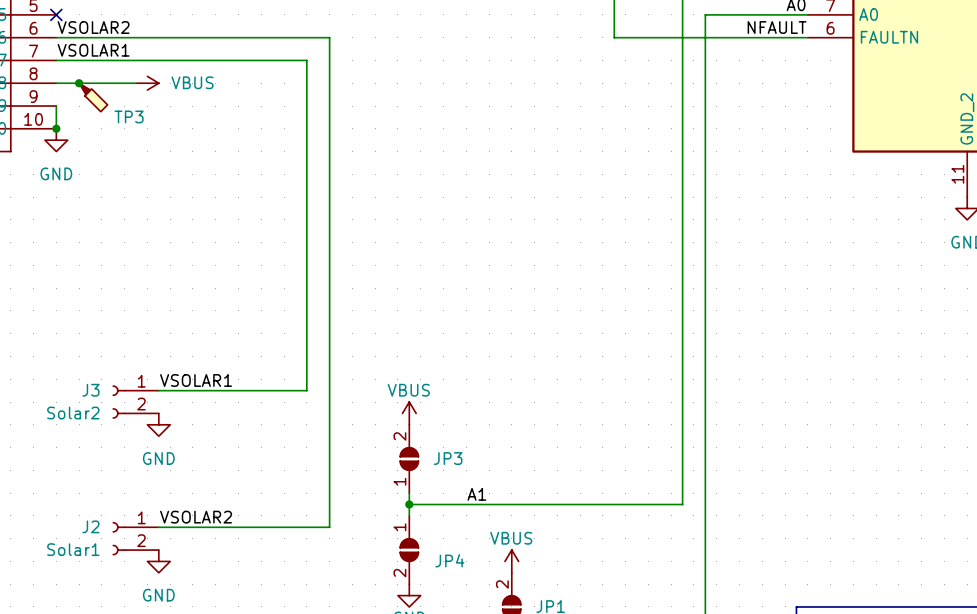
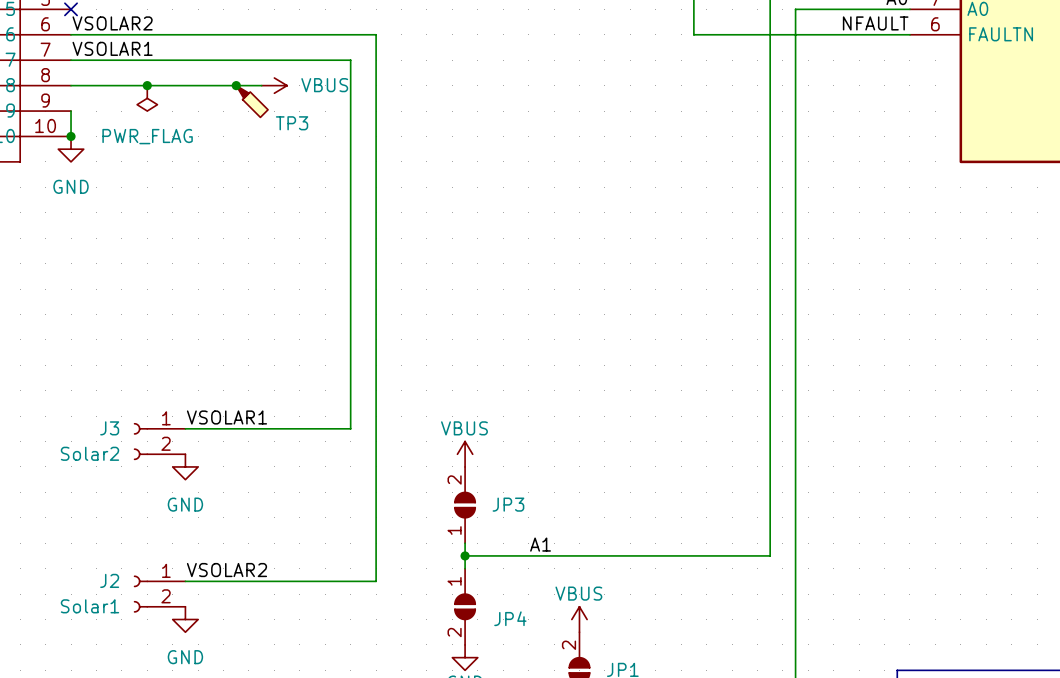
junction position: (79, 83) -> (147, 85)
wire: none -> (159, 85) (261, 85)
power symbol position: VBUS (147, 83) -> VBUS (274, 85)
junction: none -> (236, 85)
power symbol: none -> PWR_FLAG (147, 98)
TP3 position: (93, 97) -> (252, 101)

